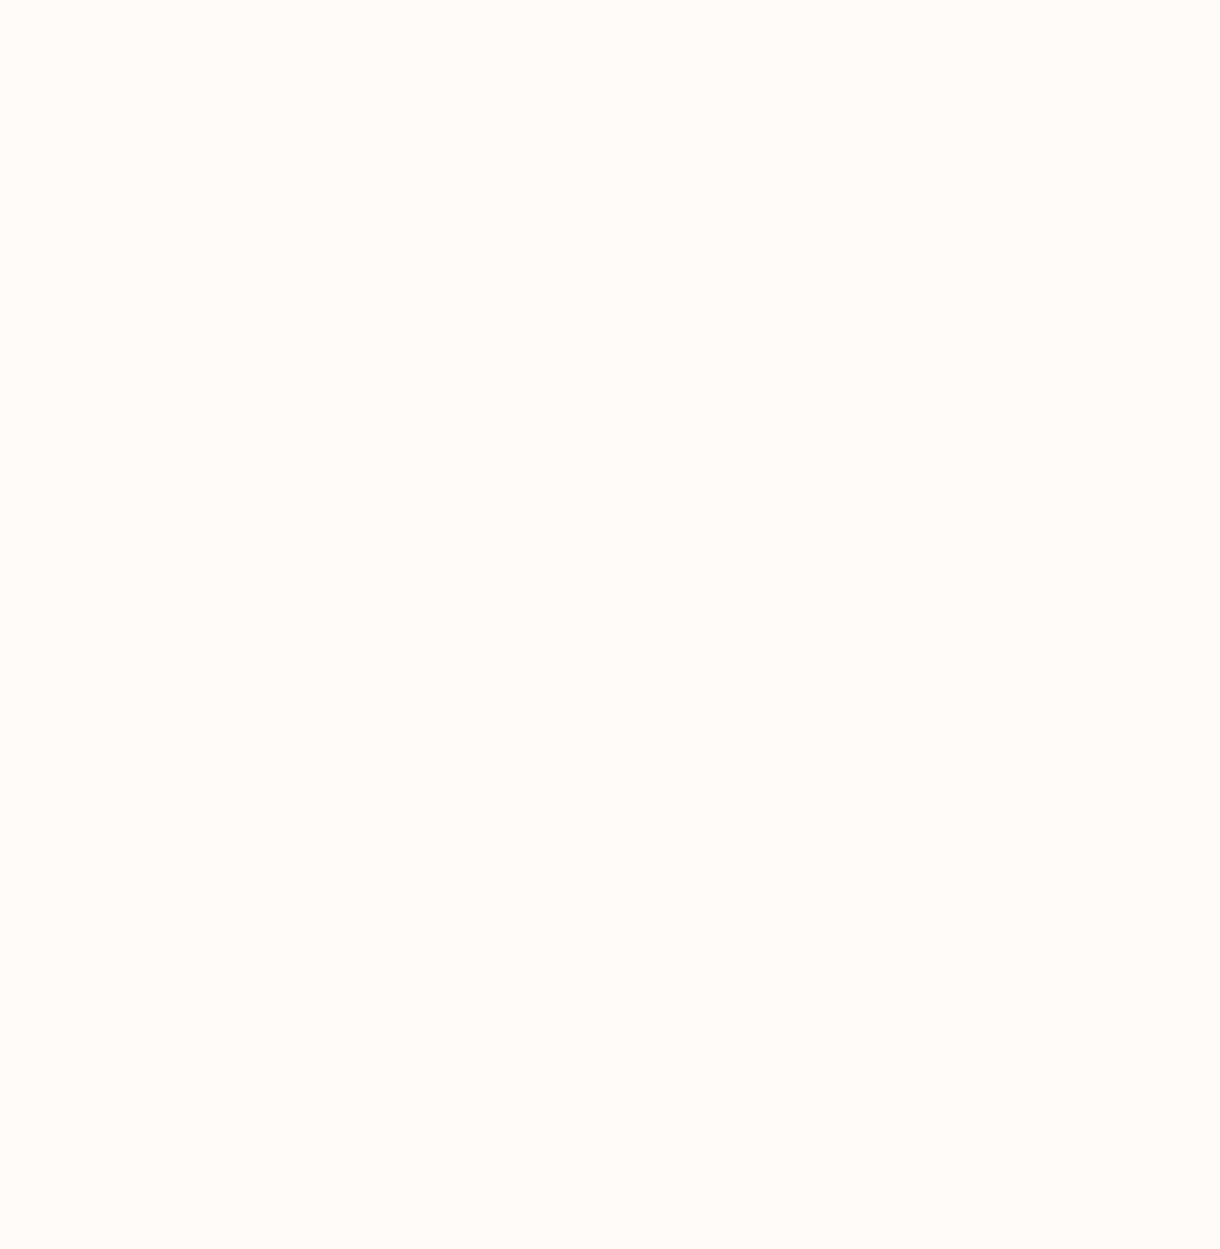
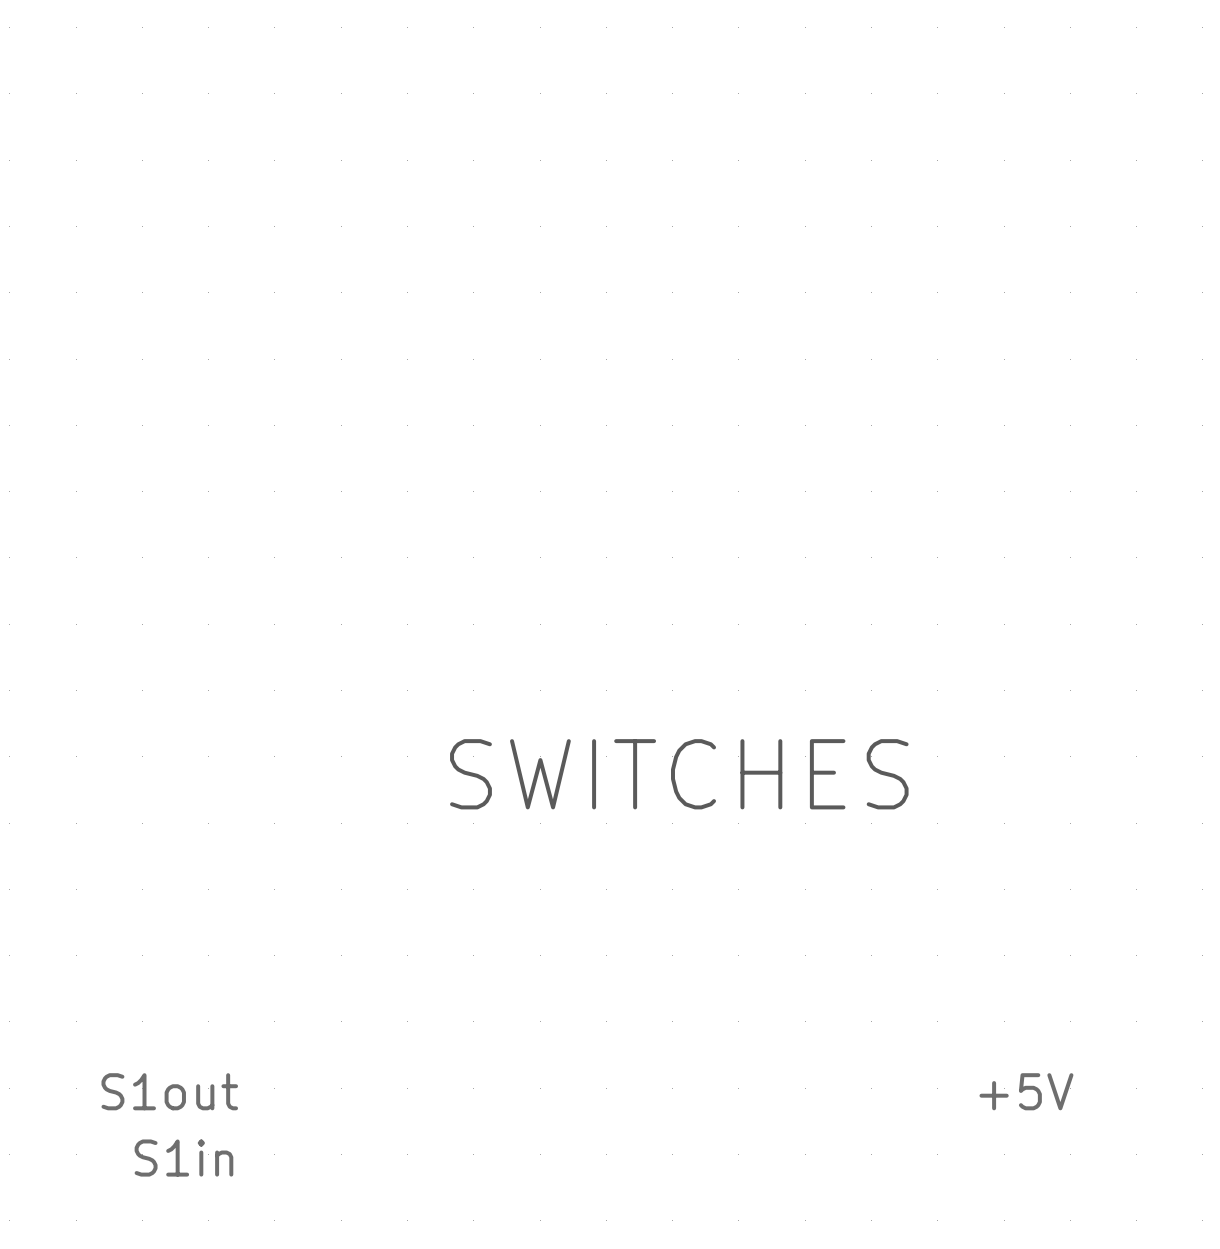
text: none -> SWITCHES (679, 774)
label: none -> S1out (169, 1091)
label: none -> +5V (1026, 1091)
label: none -> S1in (183, 1158)

